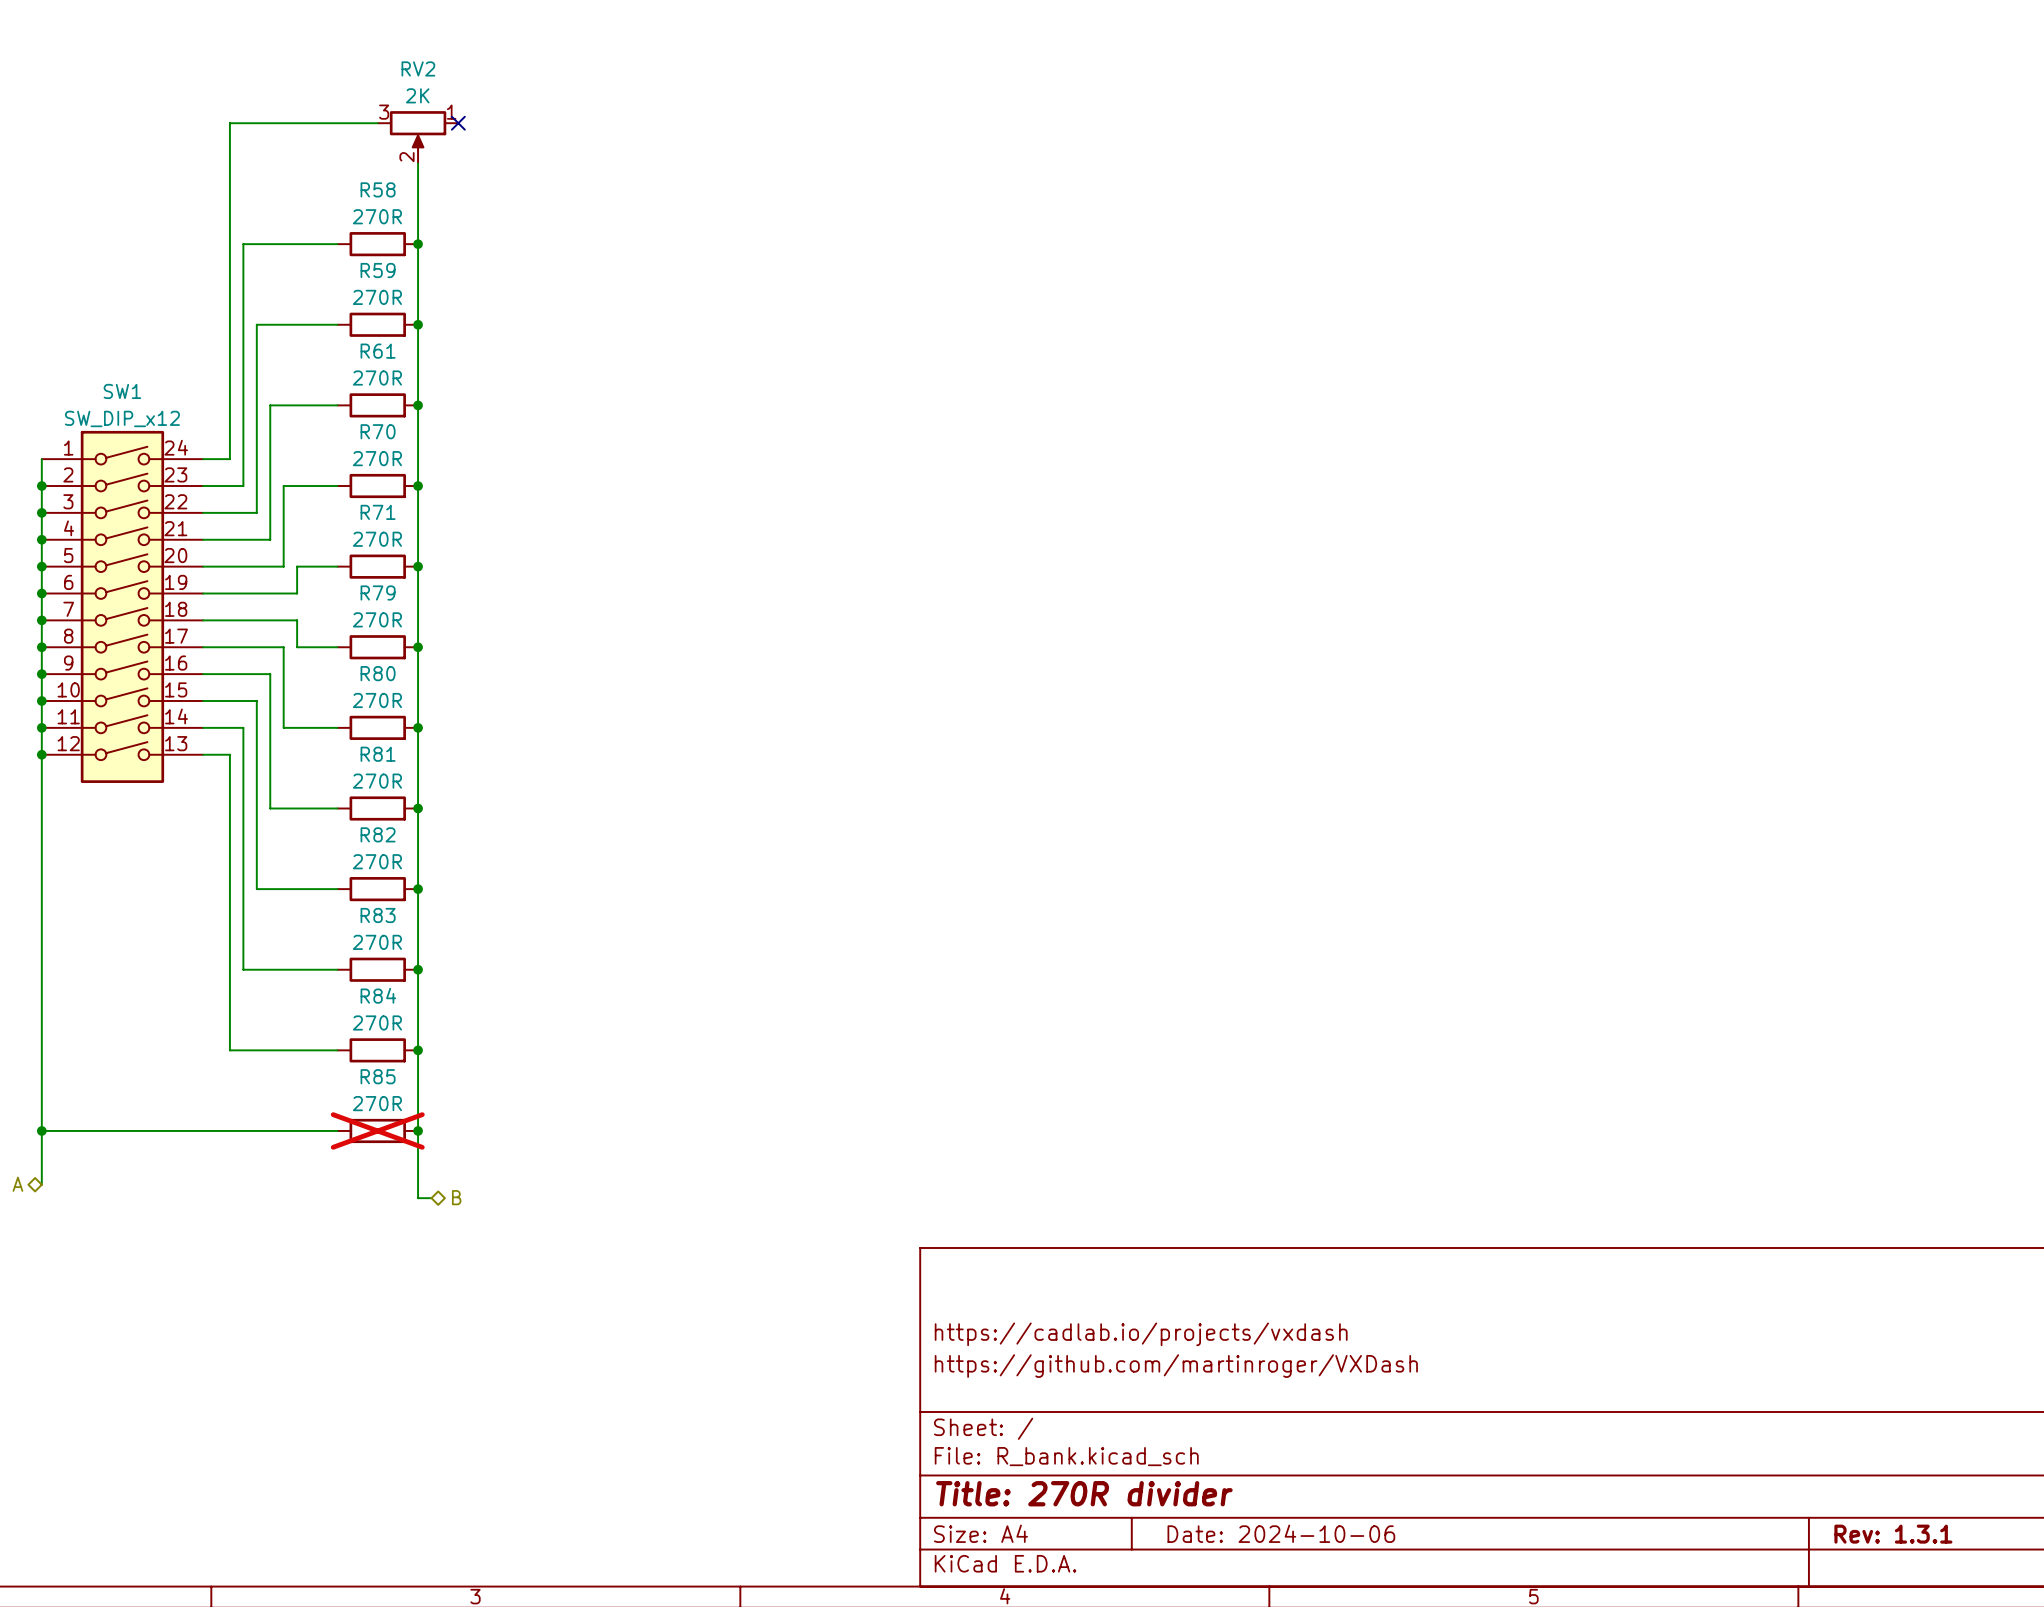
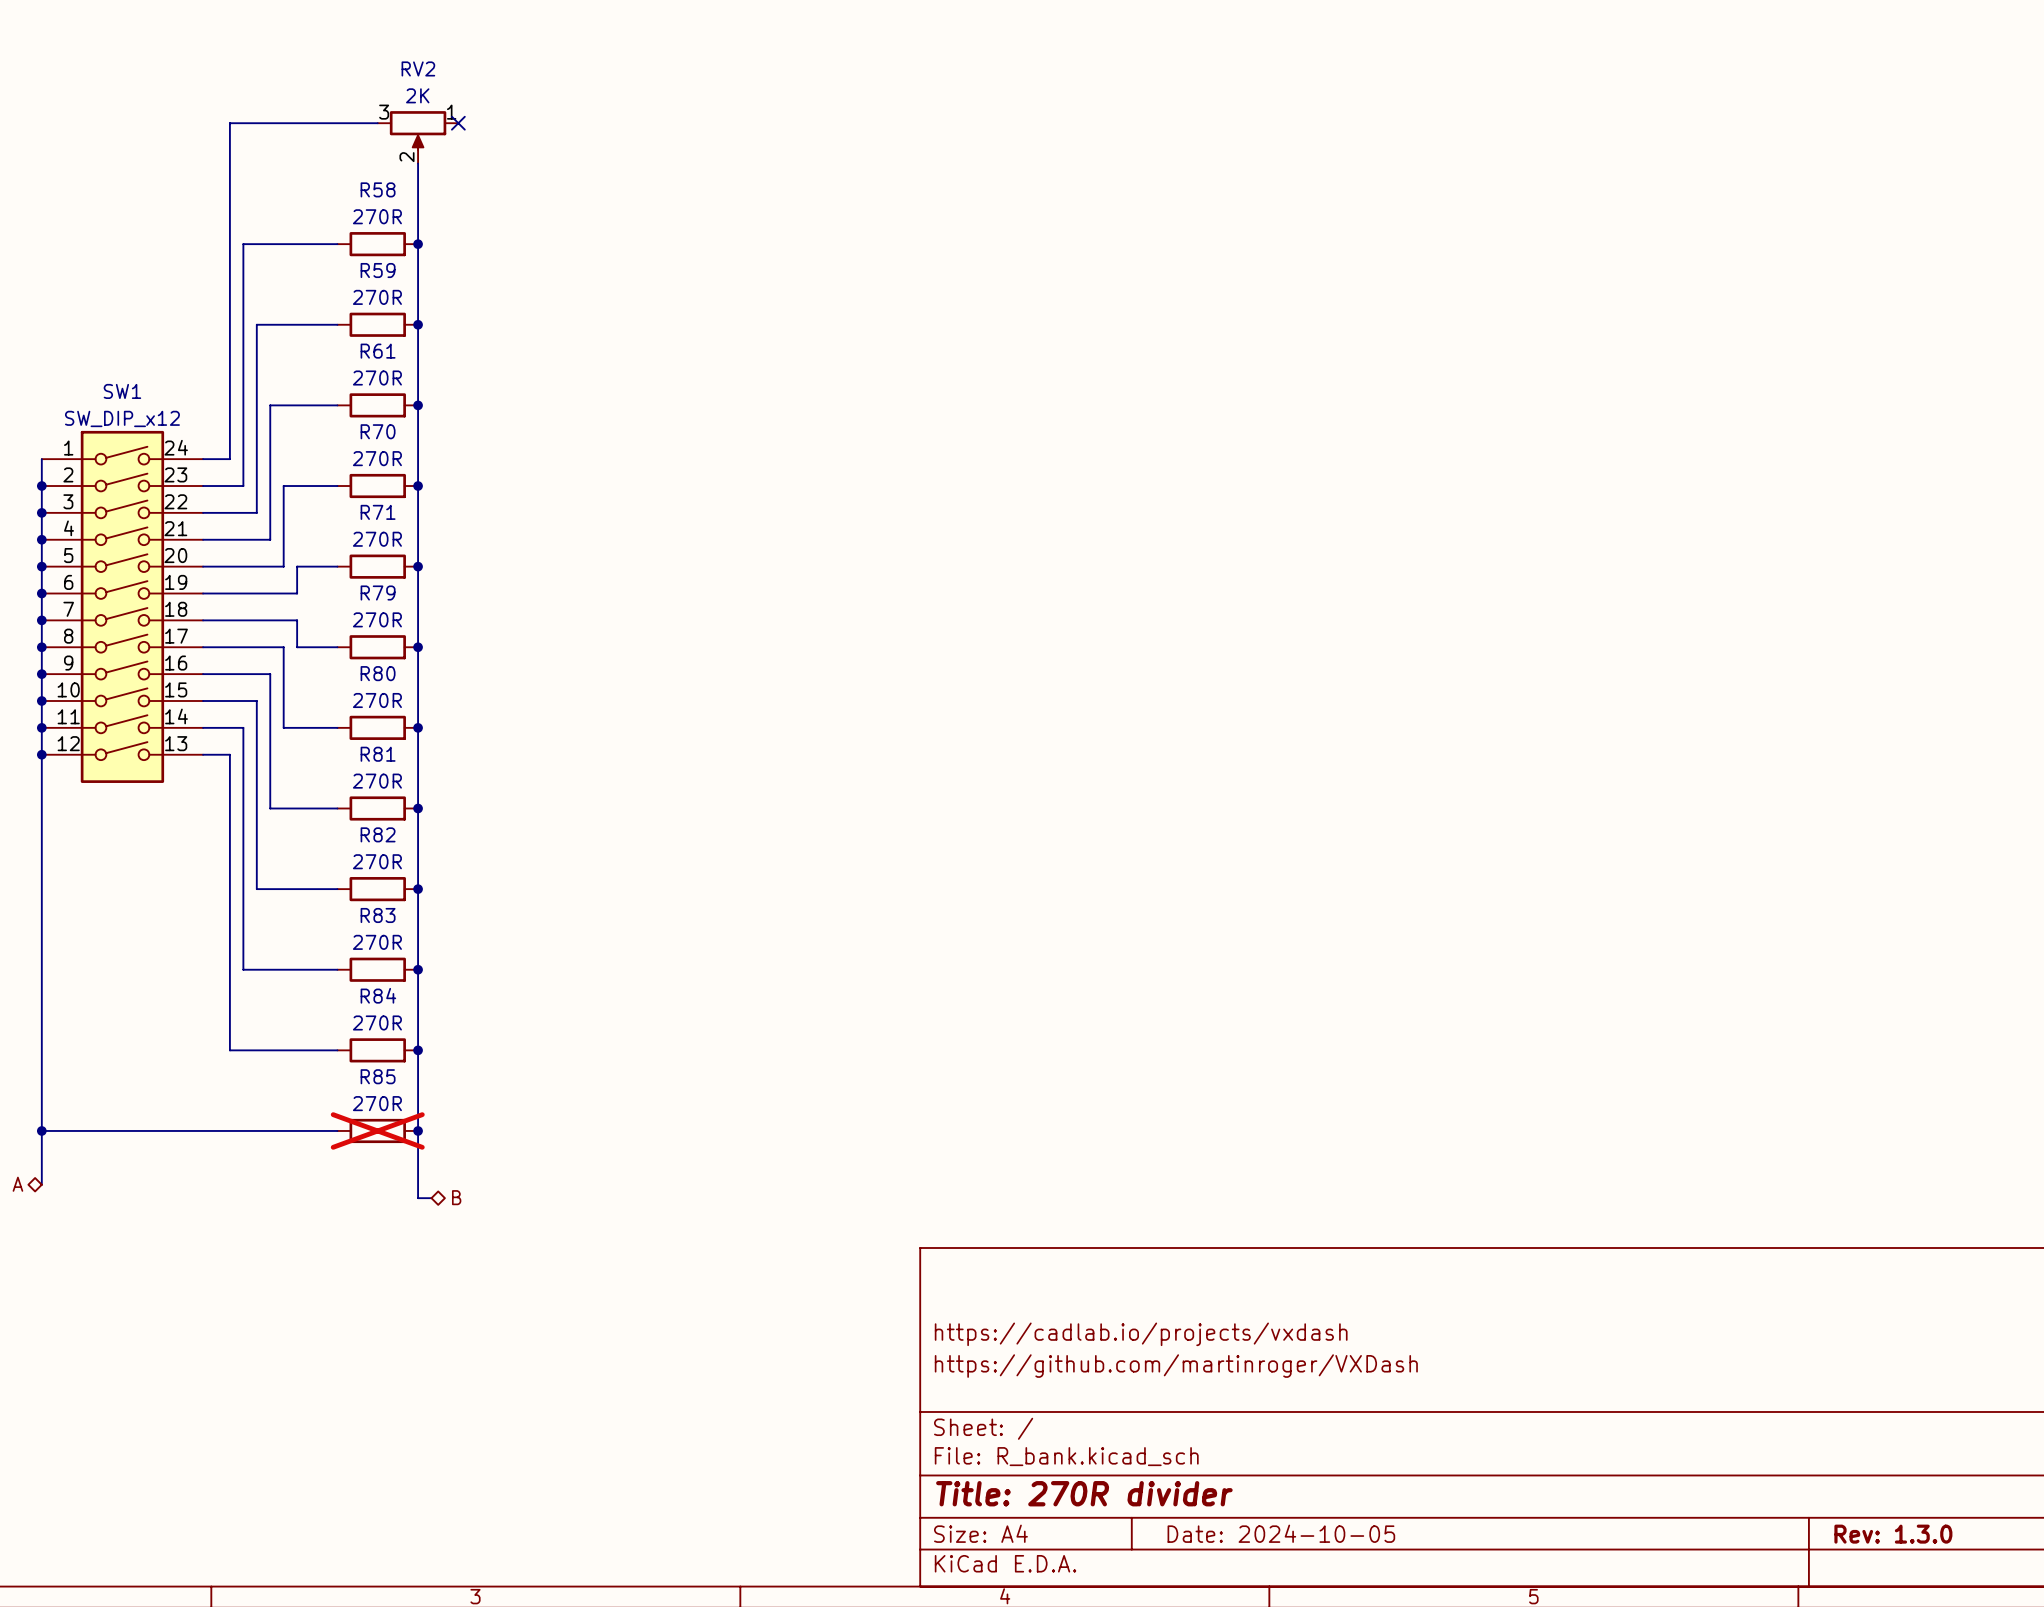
title block: Date: 2024-10-06 (1281, 1533) -> Date: 2024-10-05 (1281, 1533)
title block: Rev: 1.3.1 (1893, 1534) -> Rev: 1.3.0 (1893, 1534)

